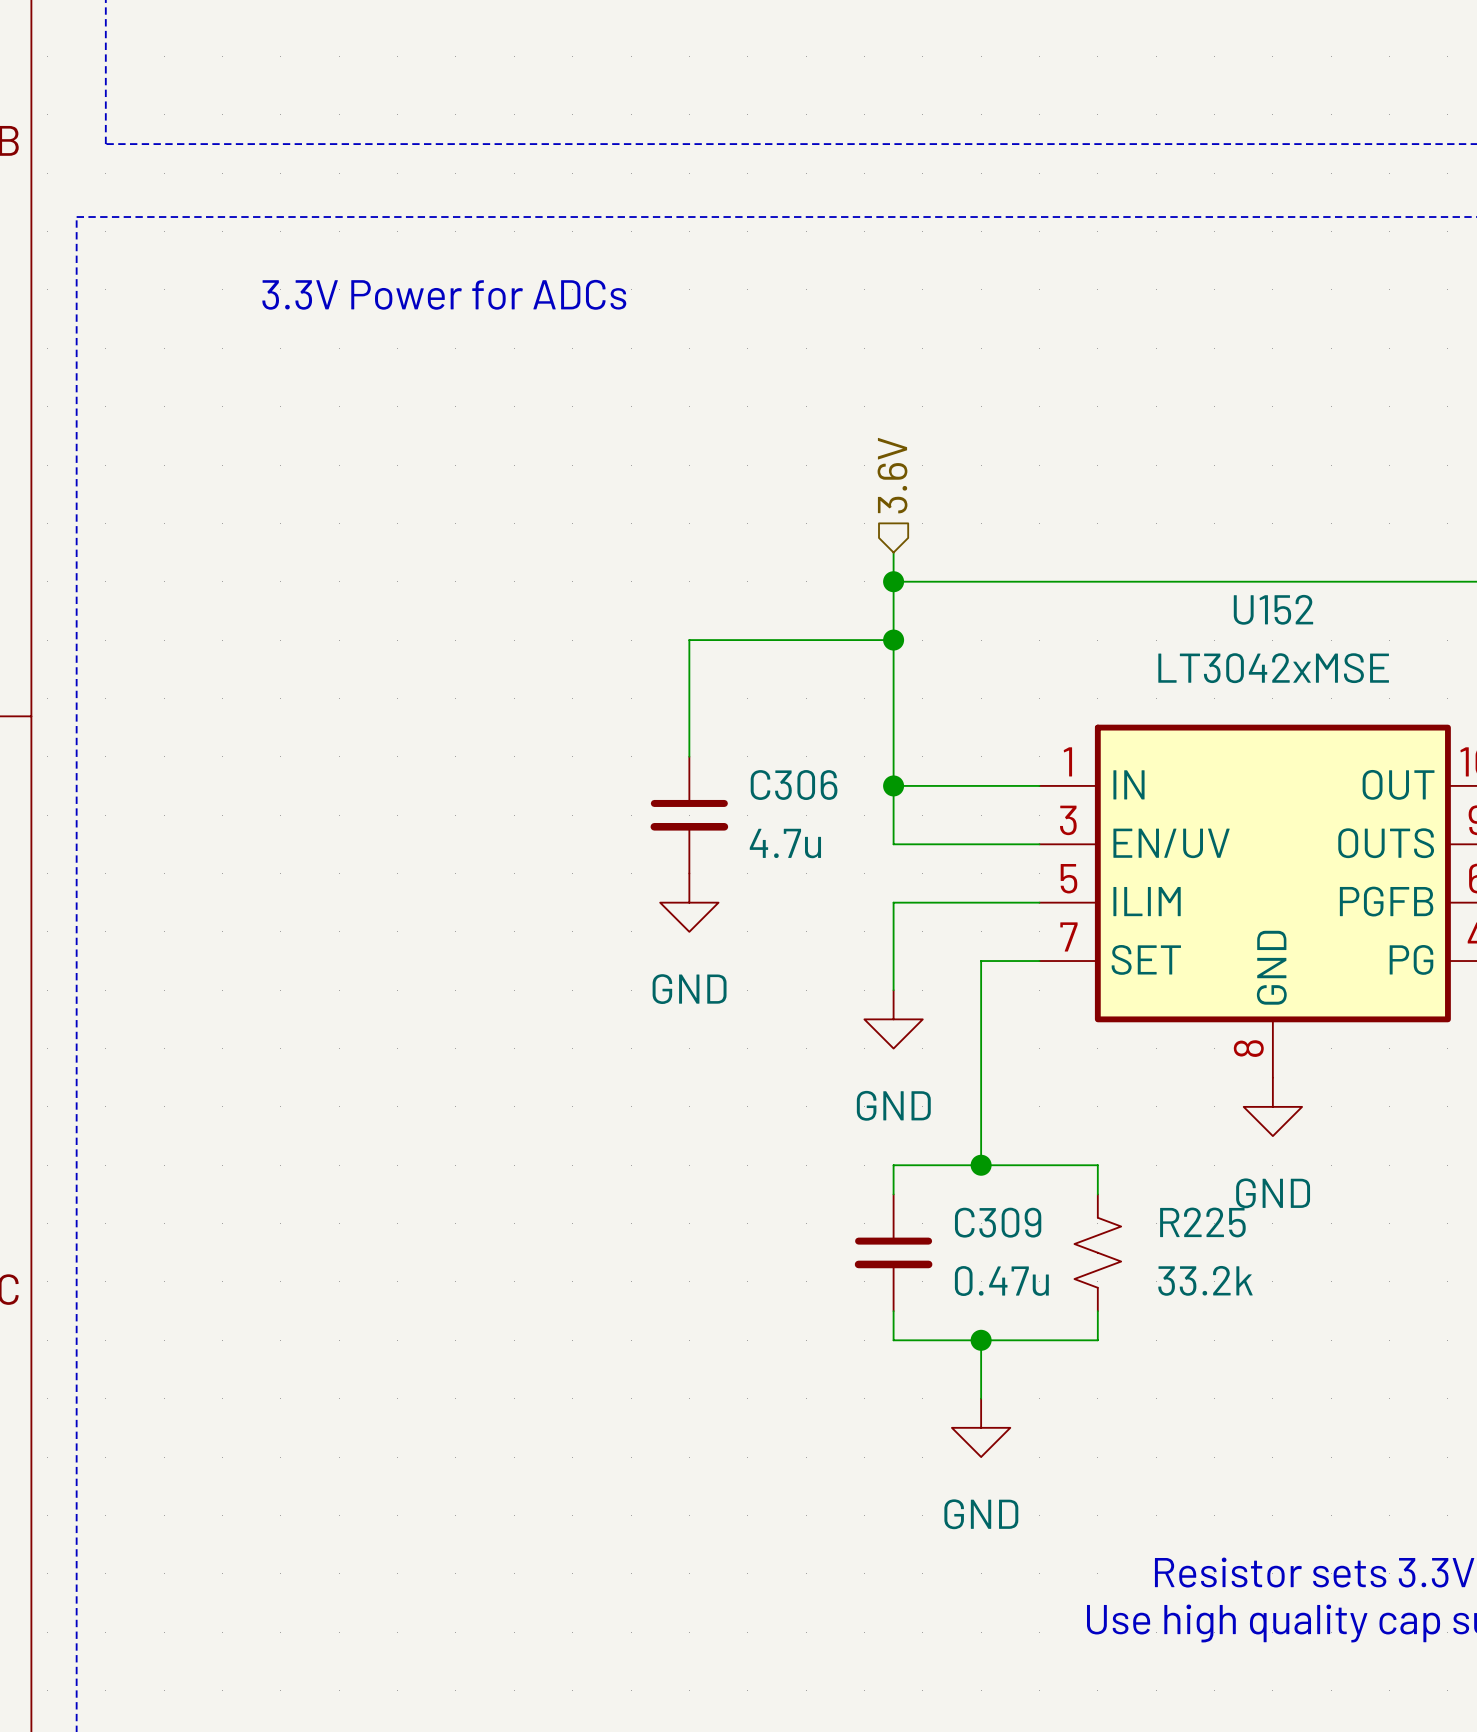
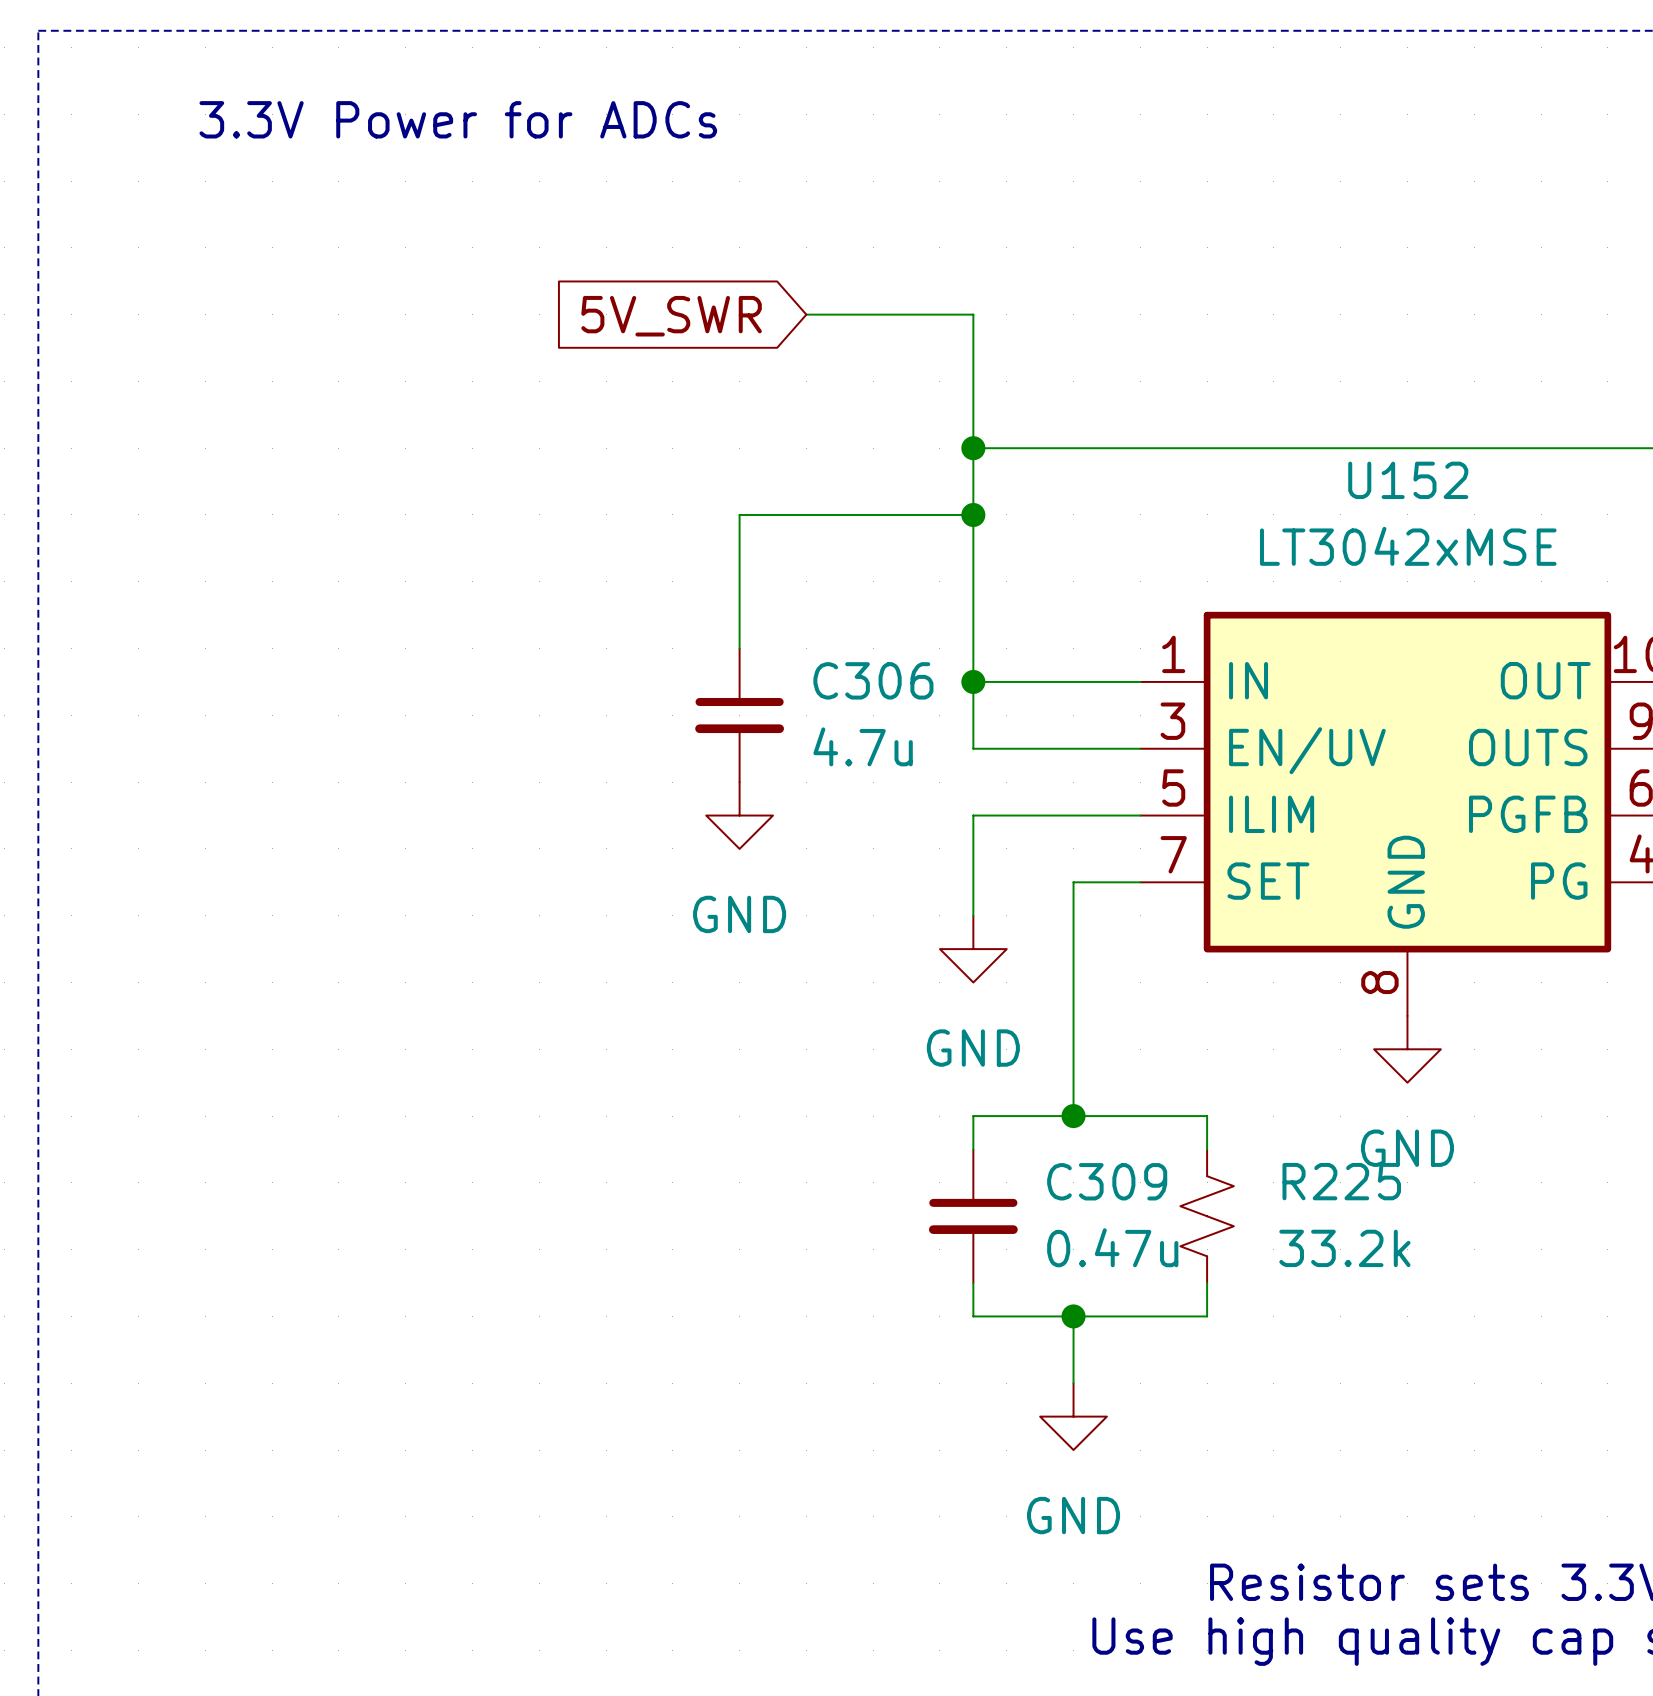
global label: none -> 5V_SWR (671, 316)
wire: none -> (806, 314) (973, 314) (973, 414)
hierarchical label: 3.6V (892, 475) -> none

